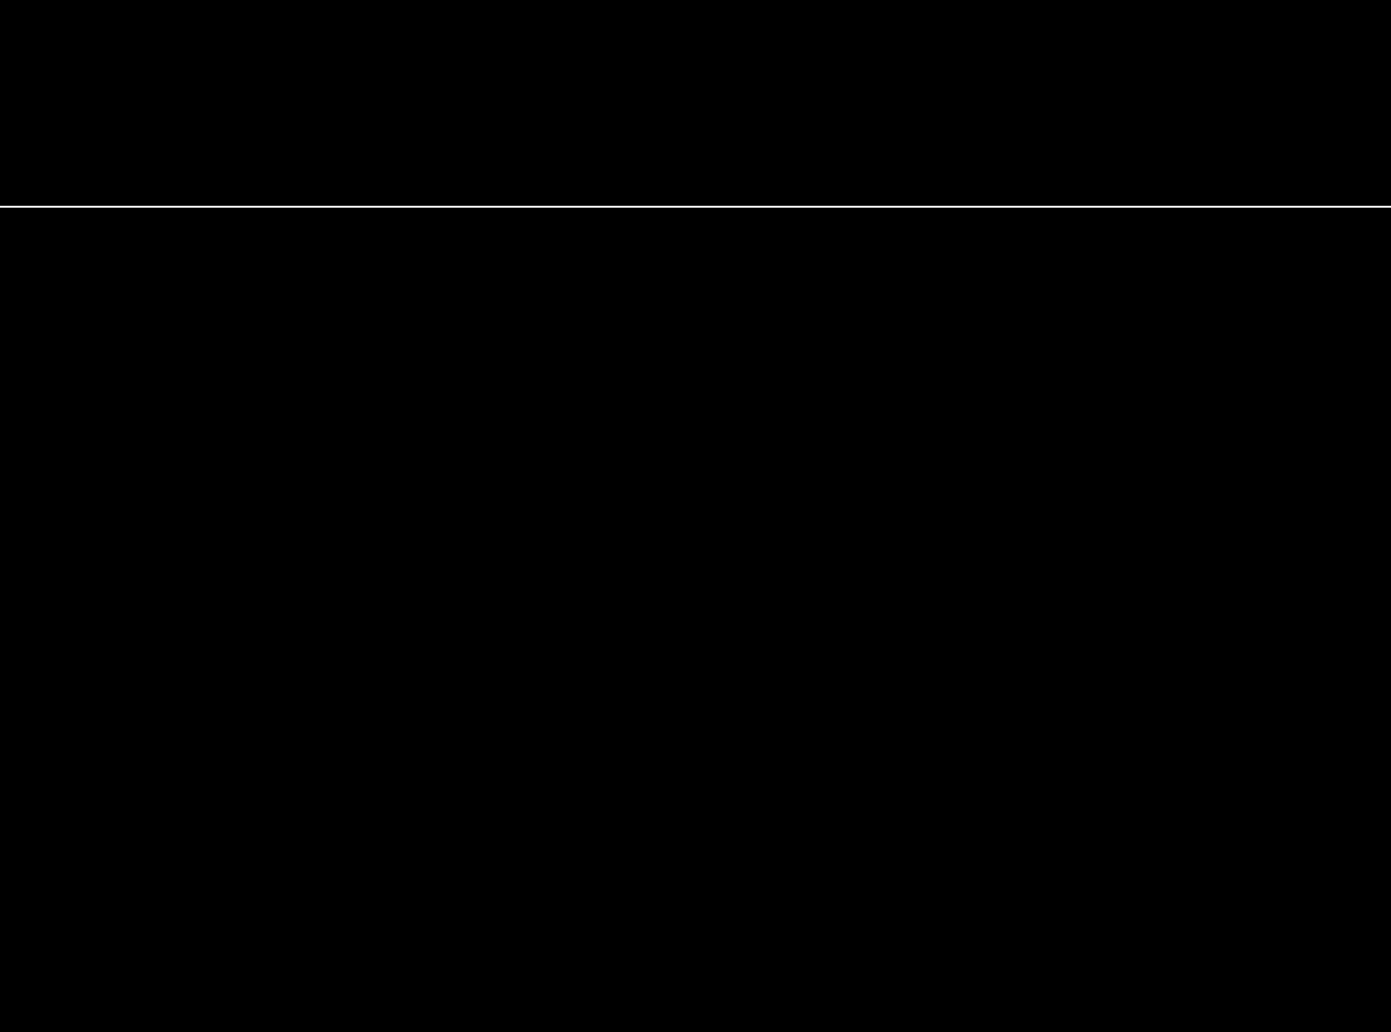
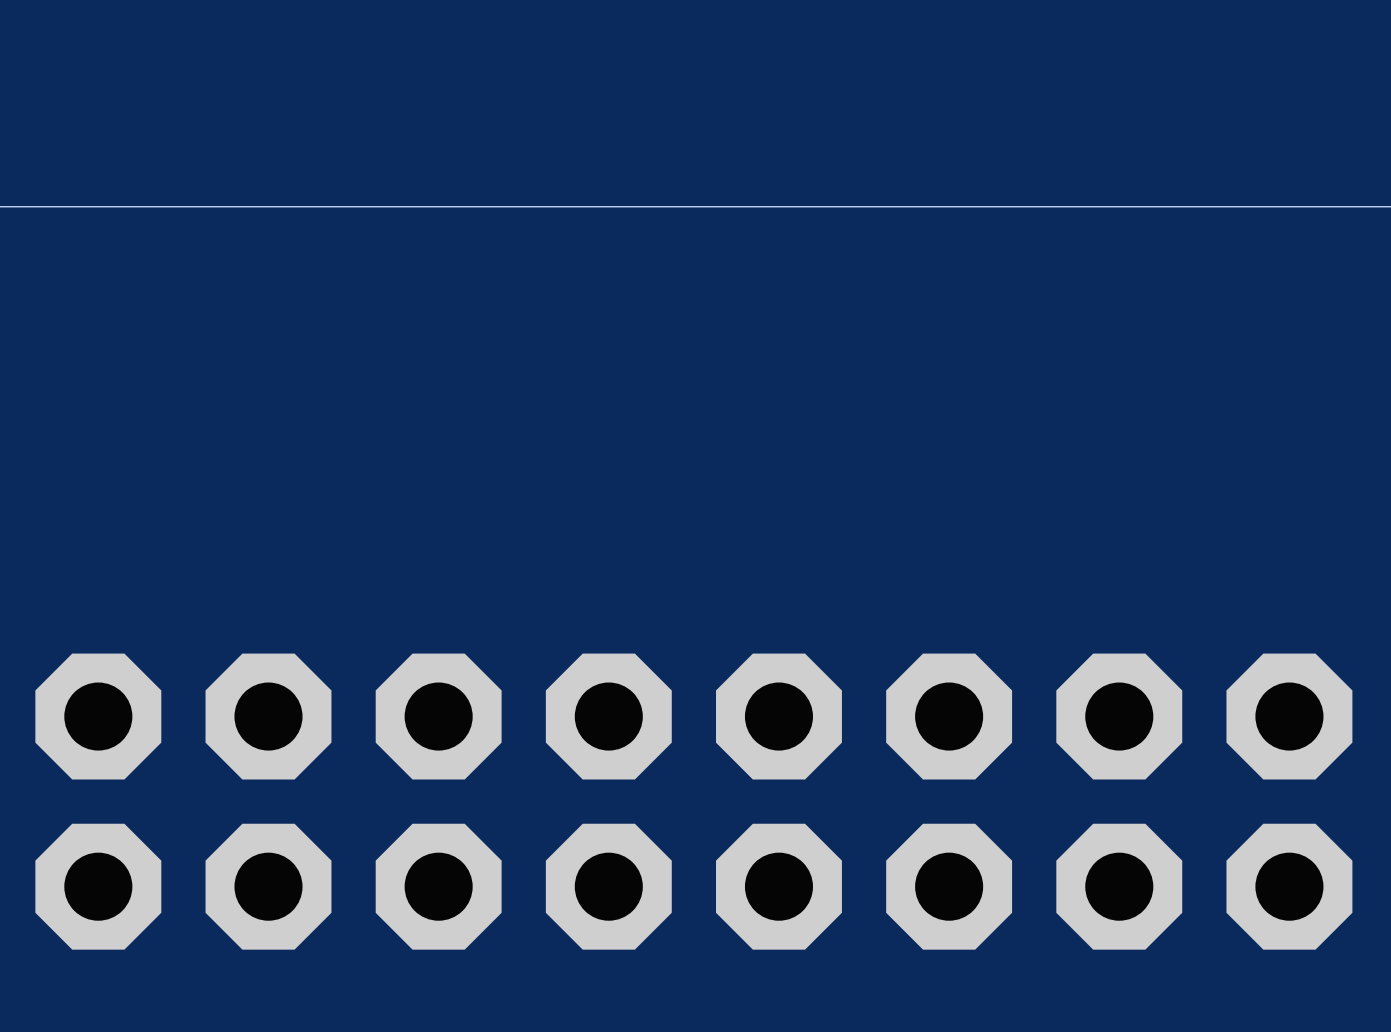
part: none -> (693, 801)

